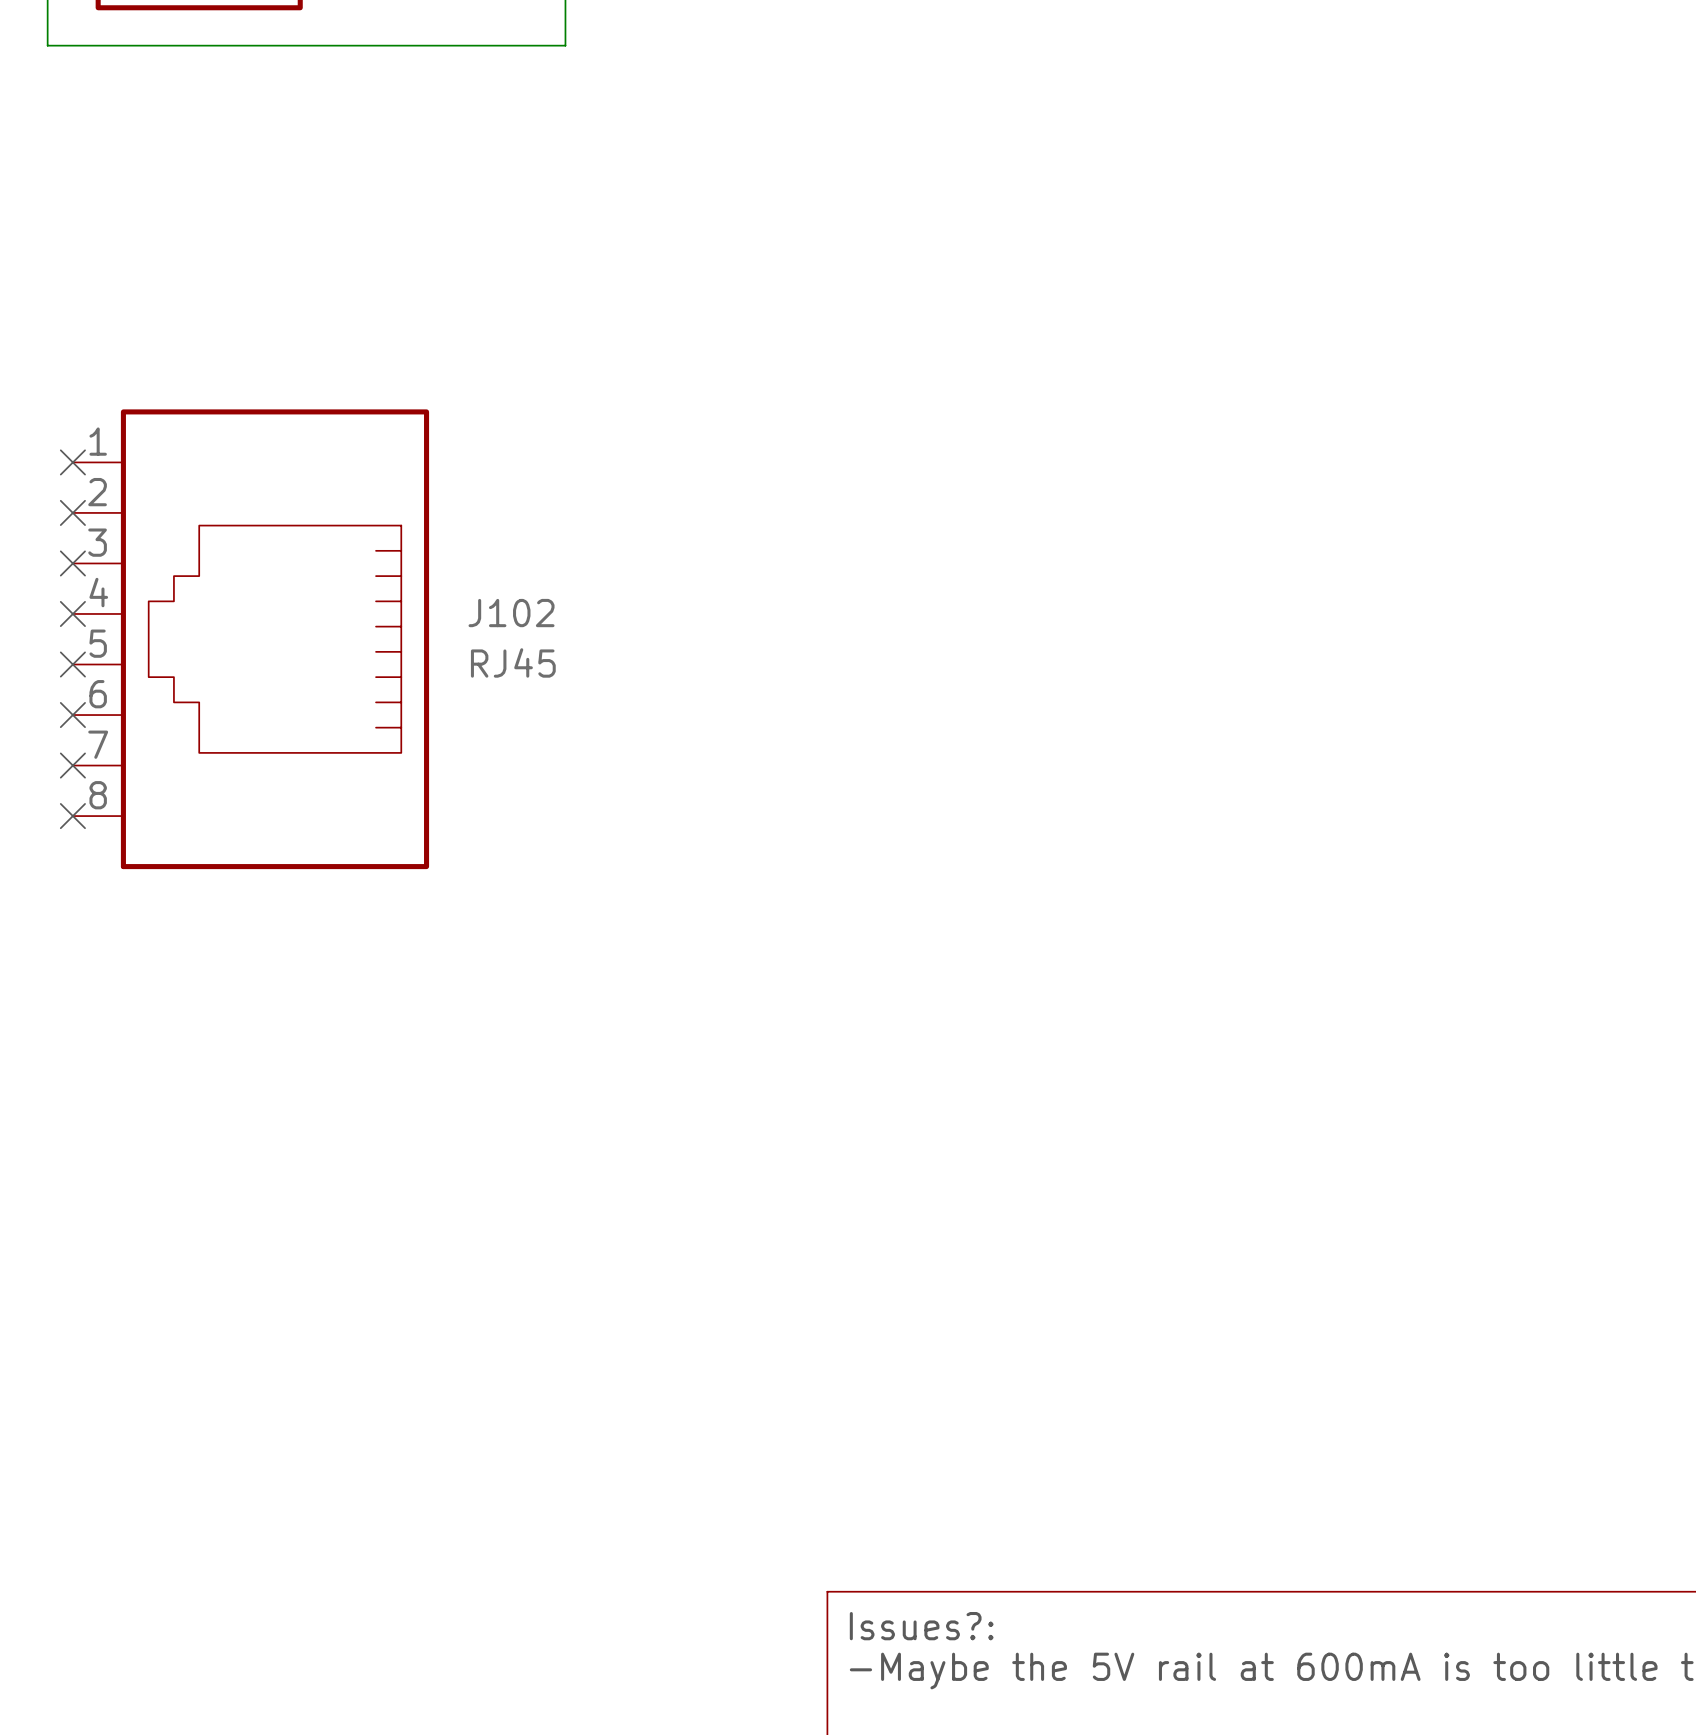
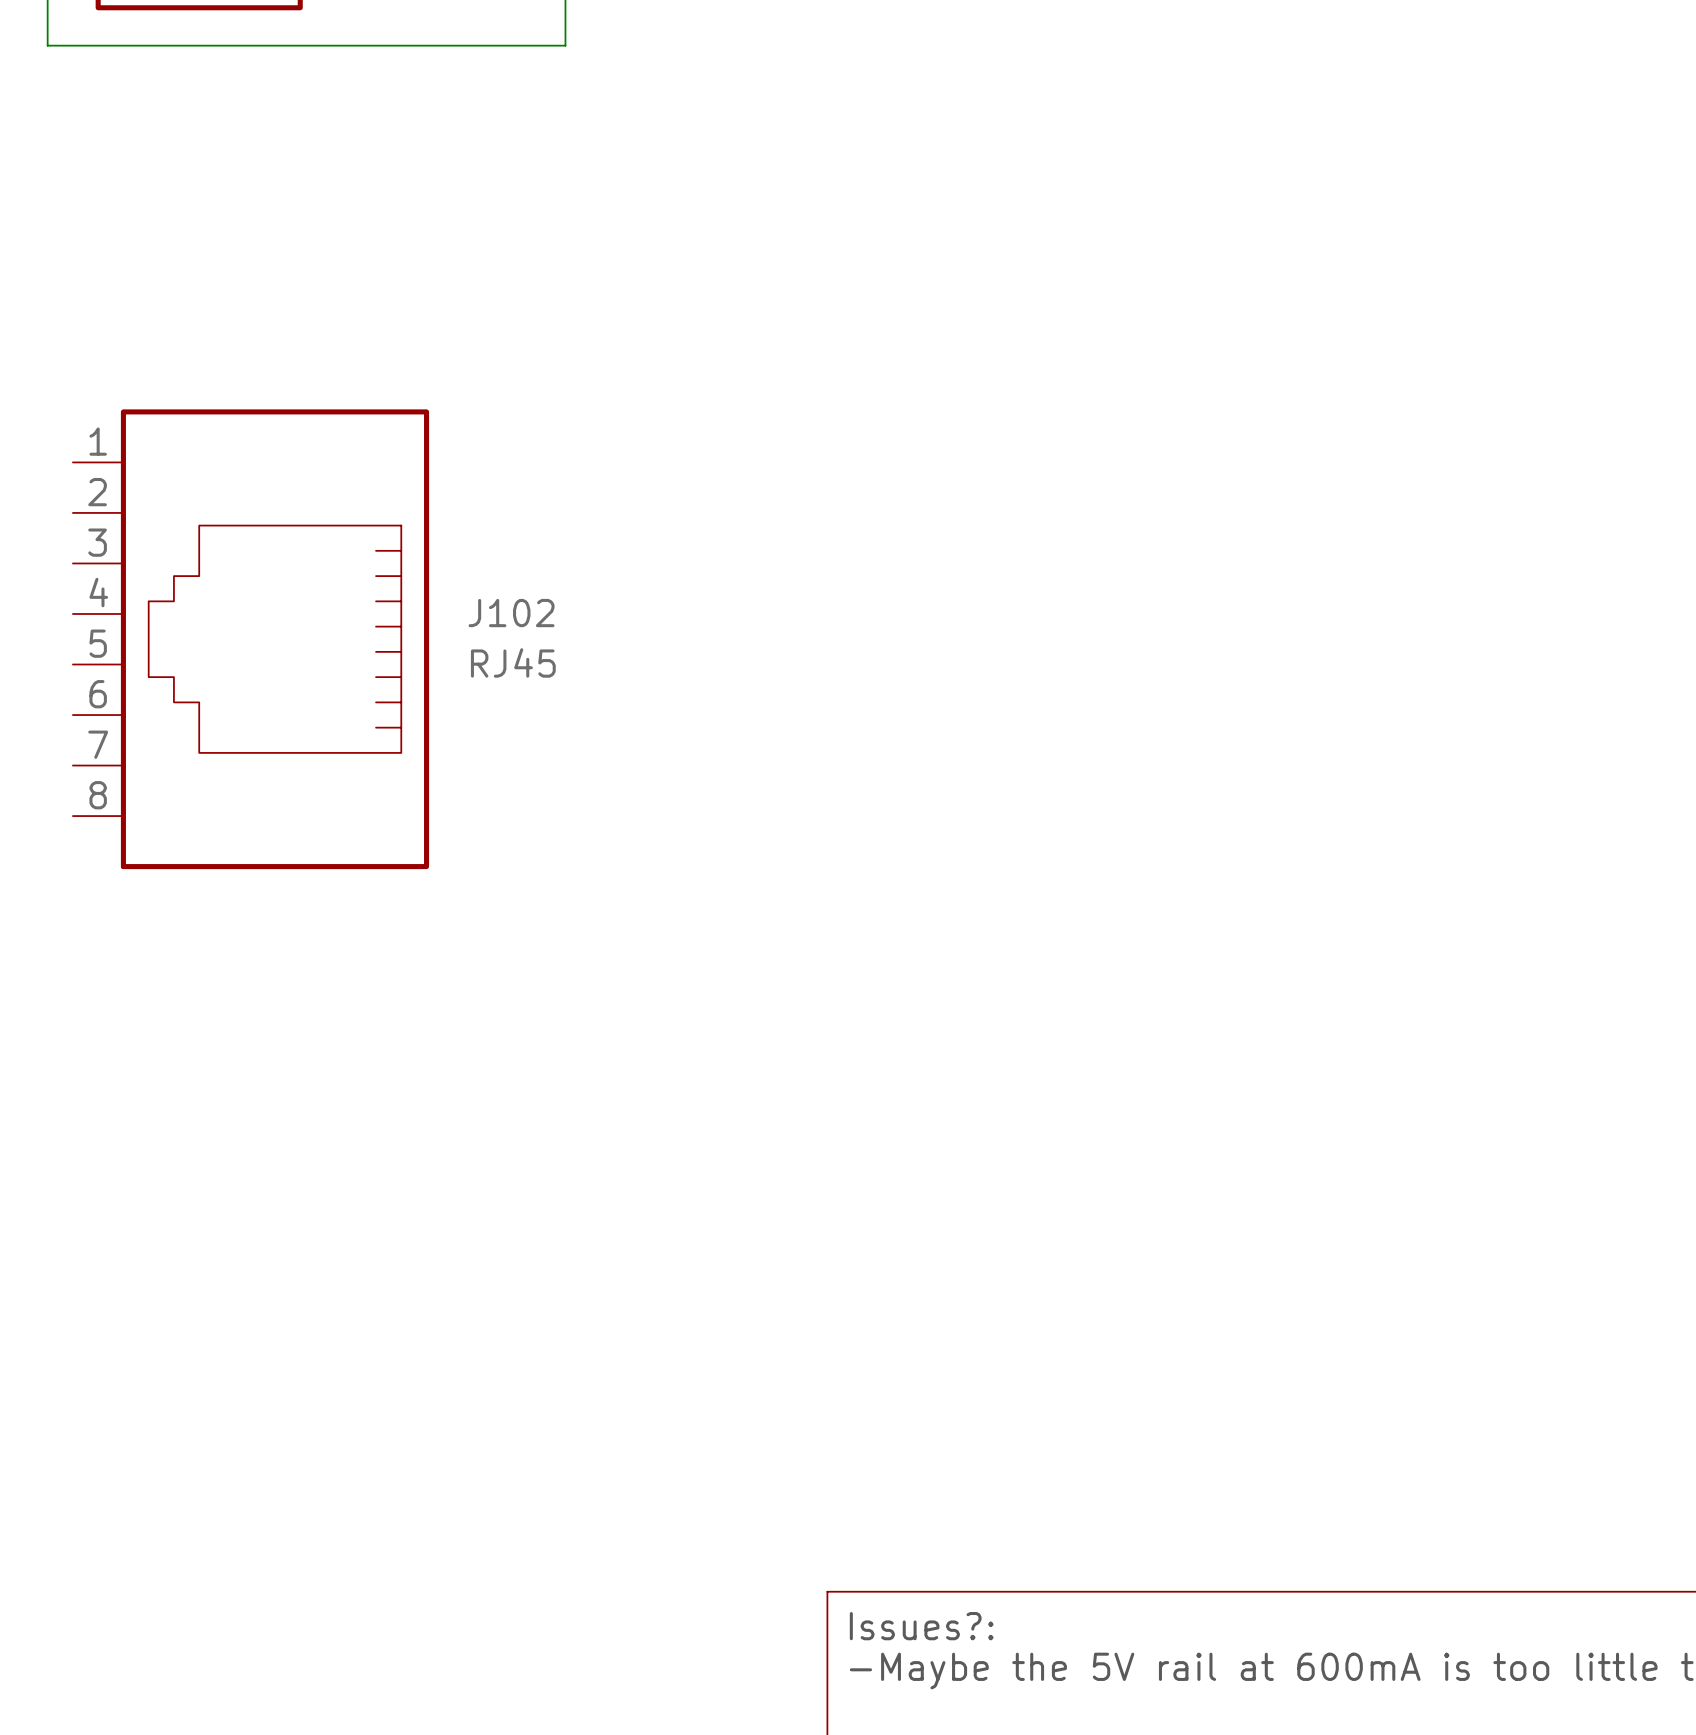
no-connect mark: (72, 462) -> none
no-connect mark: (72, 512) -> none
no-connect mark: (72, 563) -> none
no-connect mark: (72, 613) -> none
no-connect mark: (72, 664) -> none
no-connect mark: (72, 715) -> none
no-connect mark: (72, 765) -> none
no-connect mark: (72, 816) -> none

